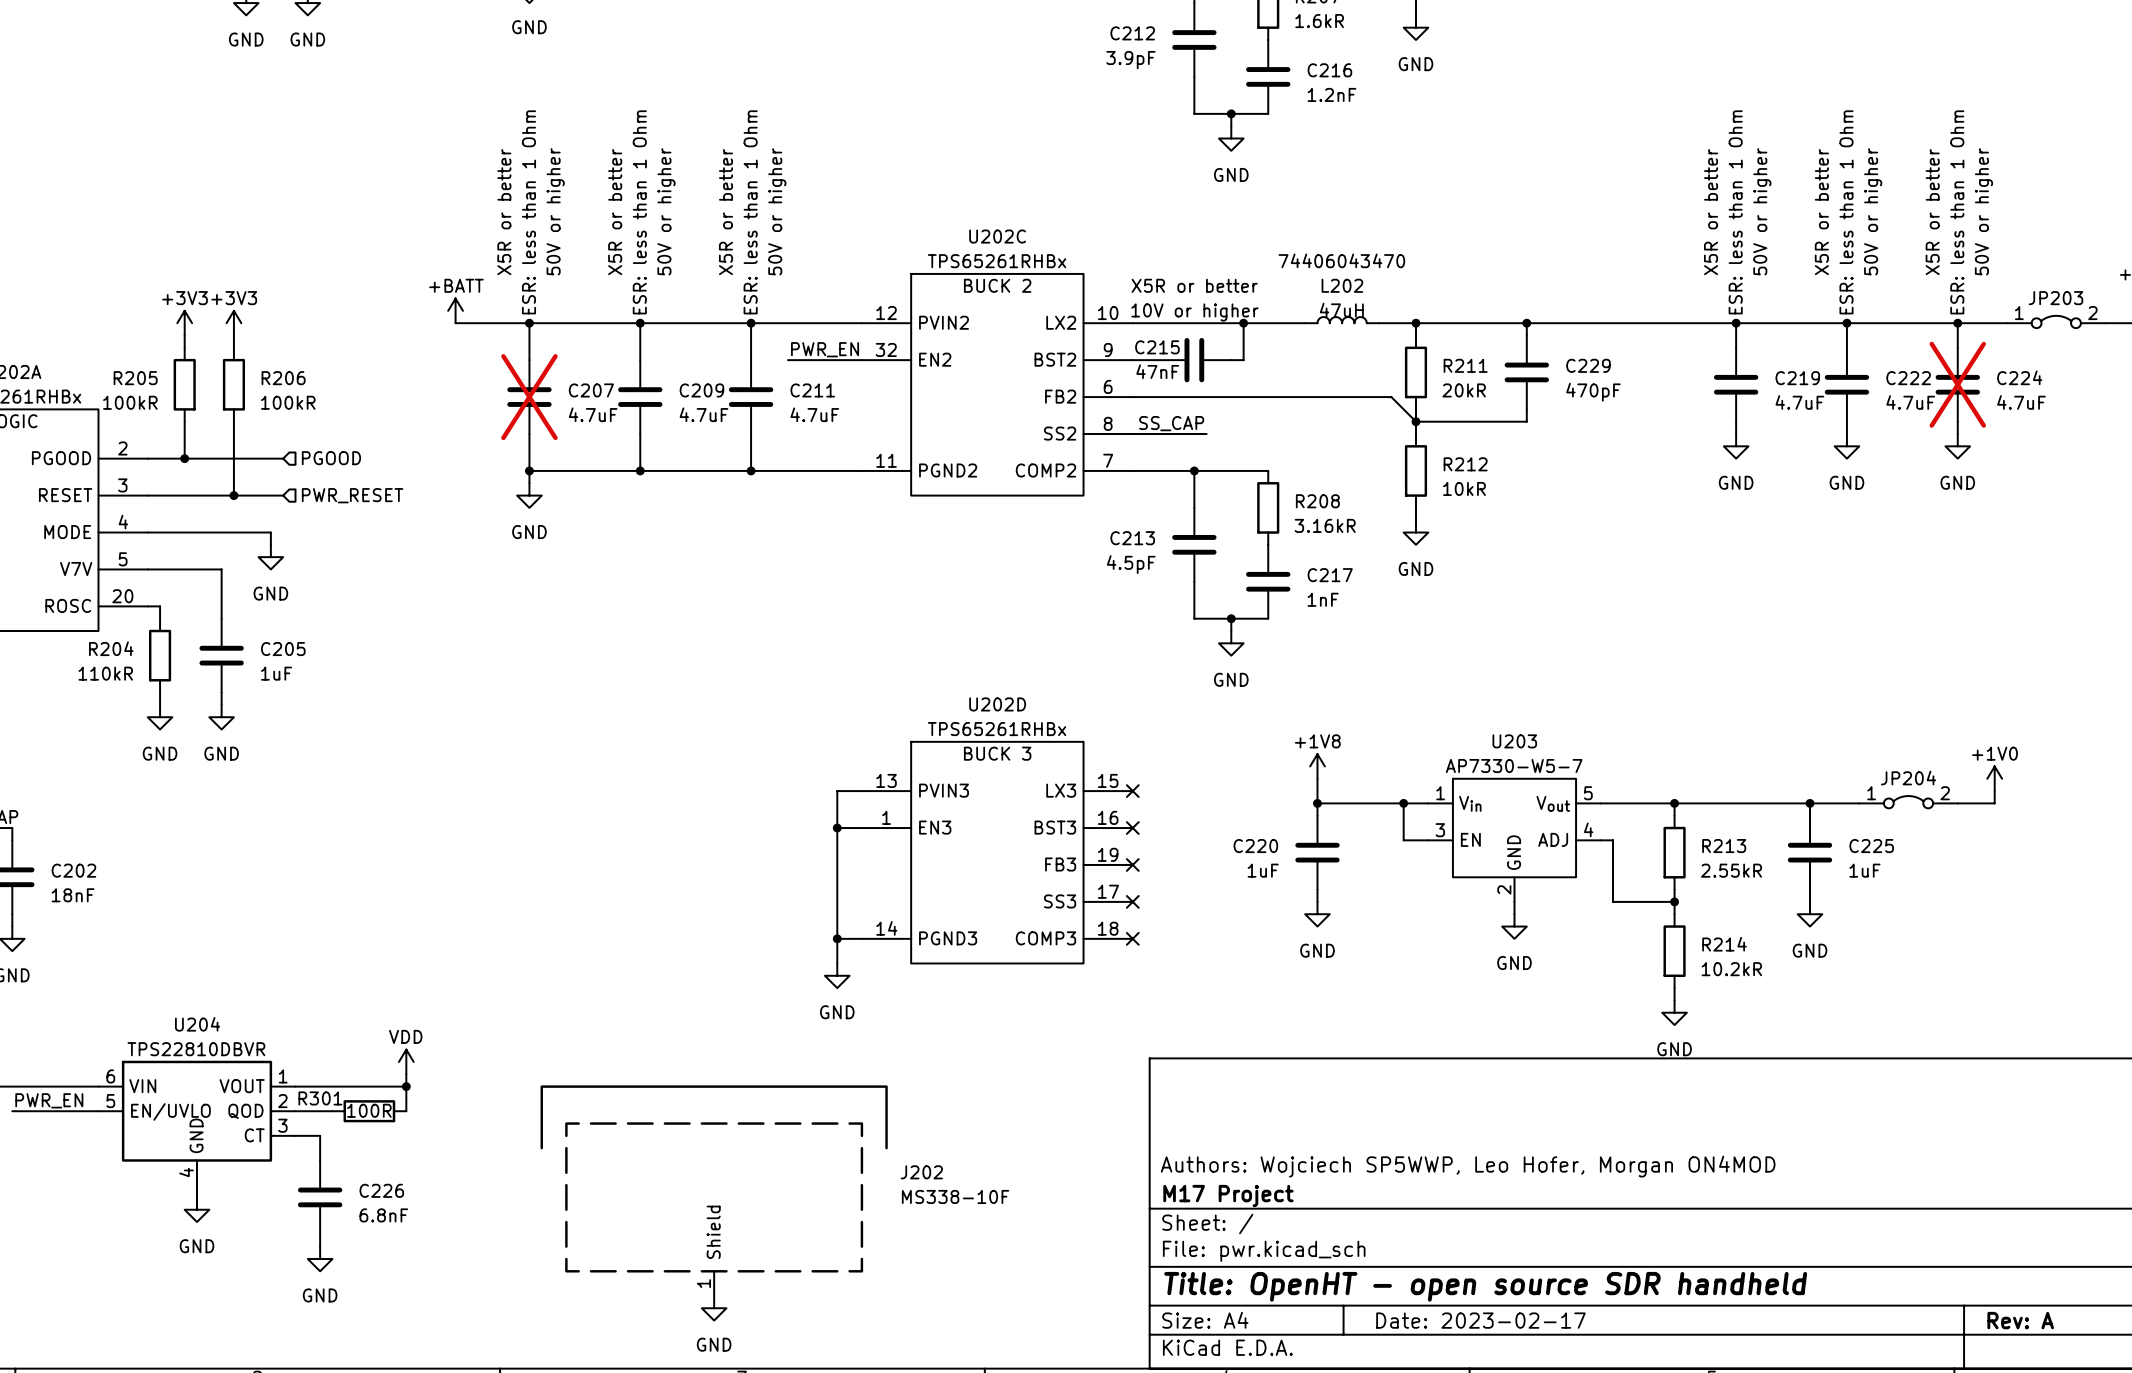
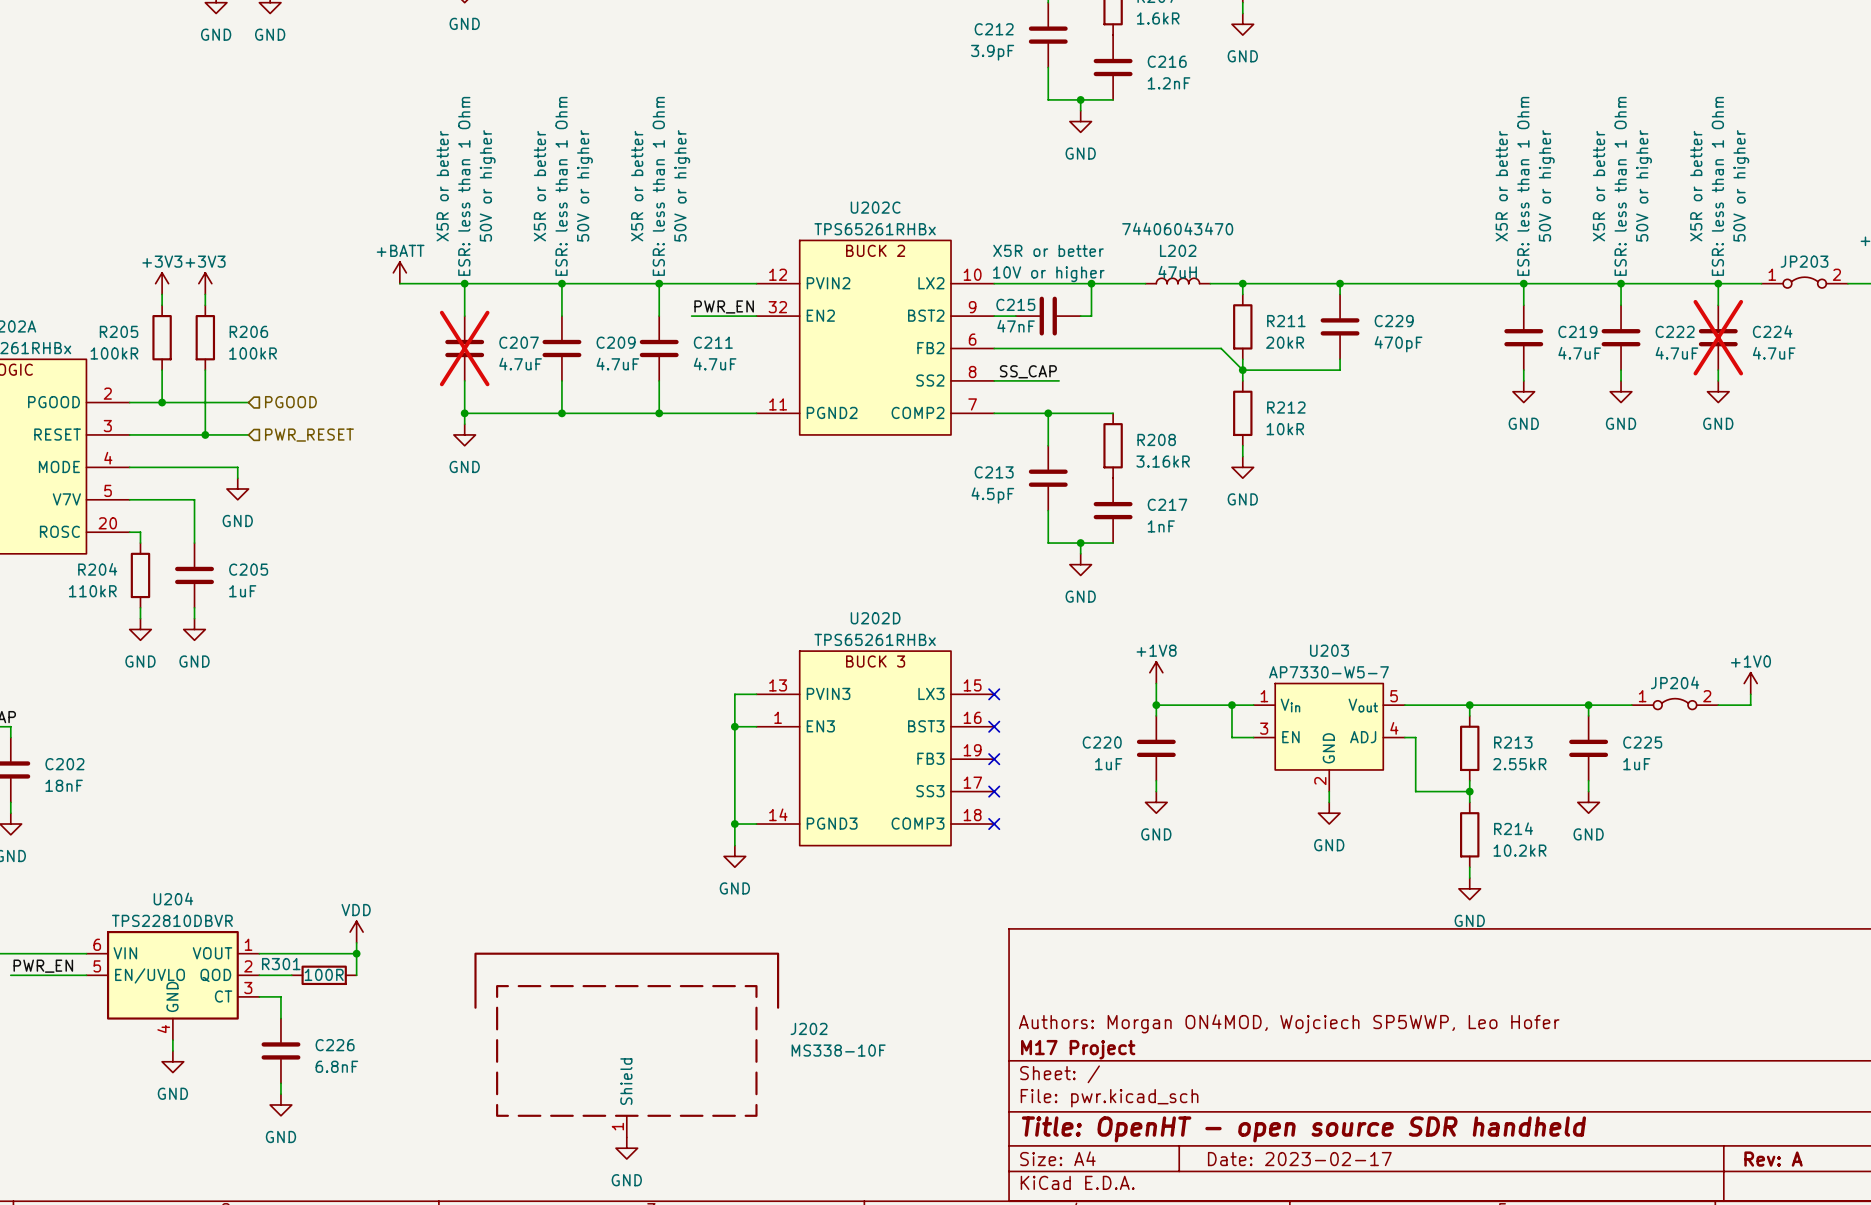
title block: Authors: Wojciech SP5WWP, Leo Hofer, Morgan ON4MOD (1468, 1166) -> Authors: Morgan ON4MOD, Wojciech SP5WWP, Leo Hofer (1289, 1023)

